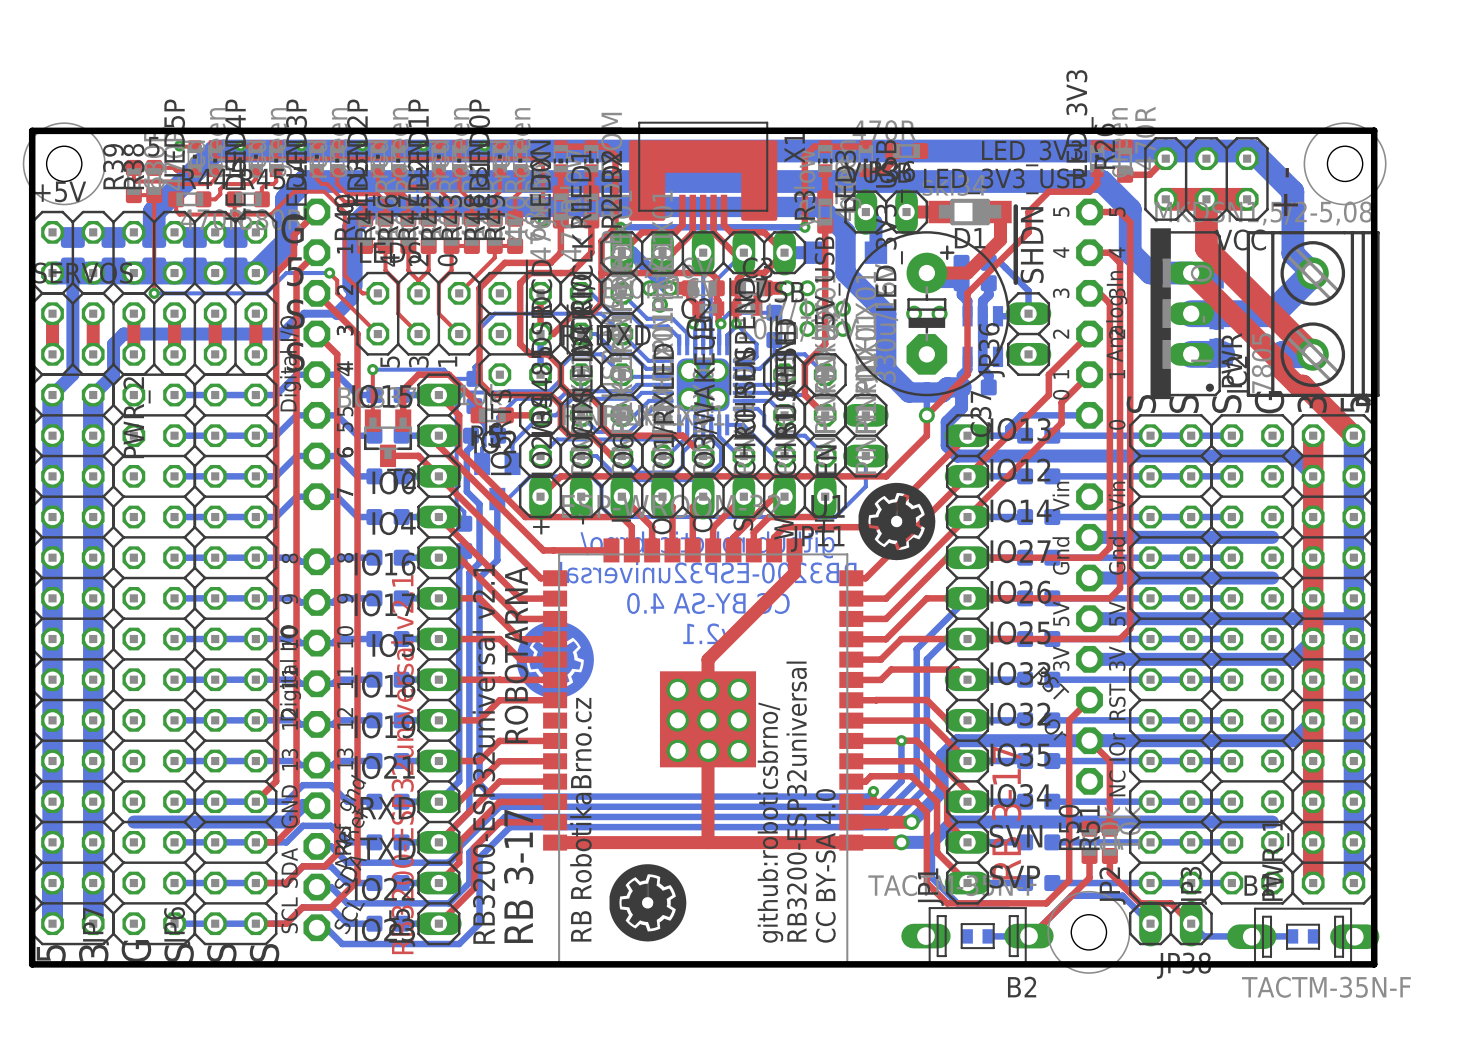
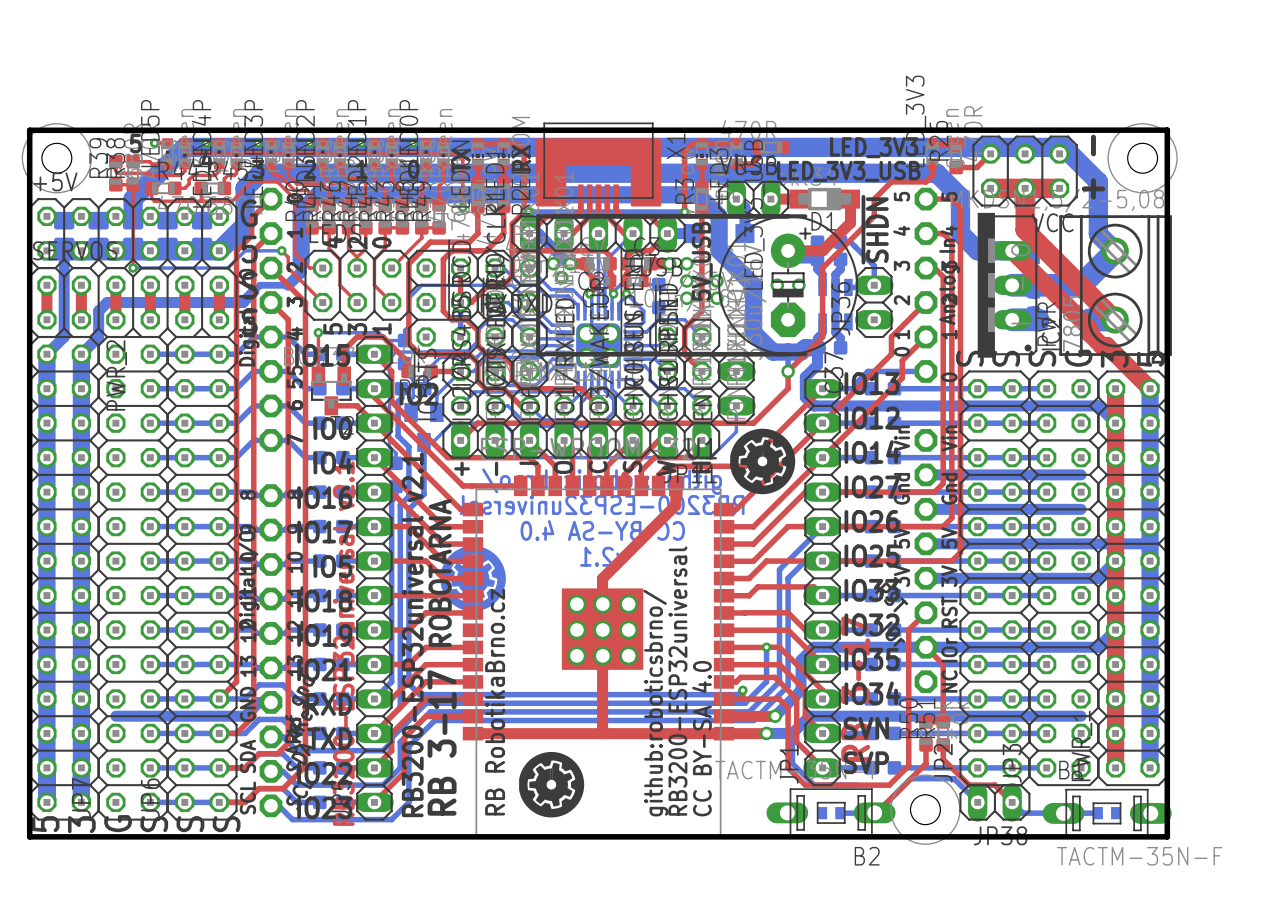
line: none -> (805, 216) (538, 216) (538, 354) (805, 354)

